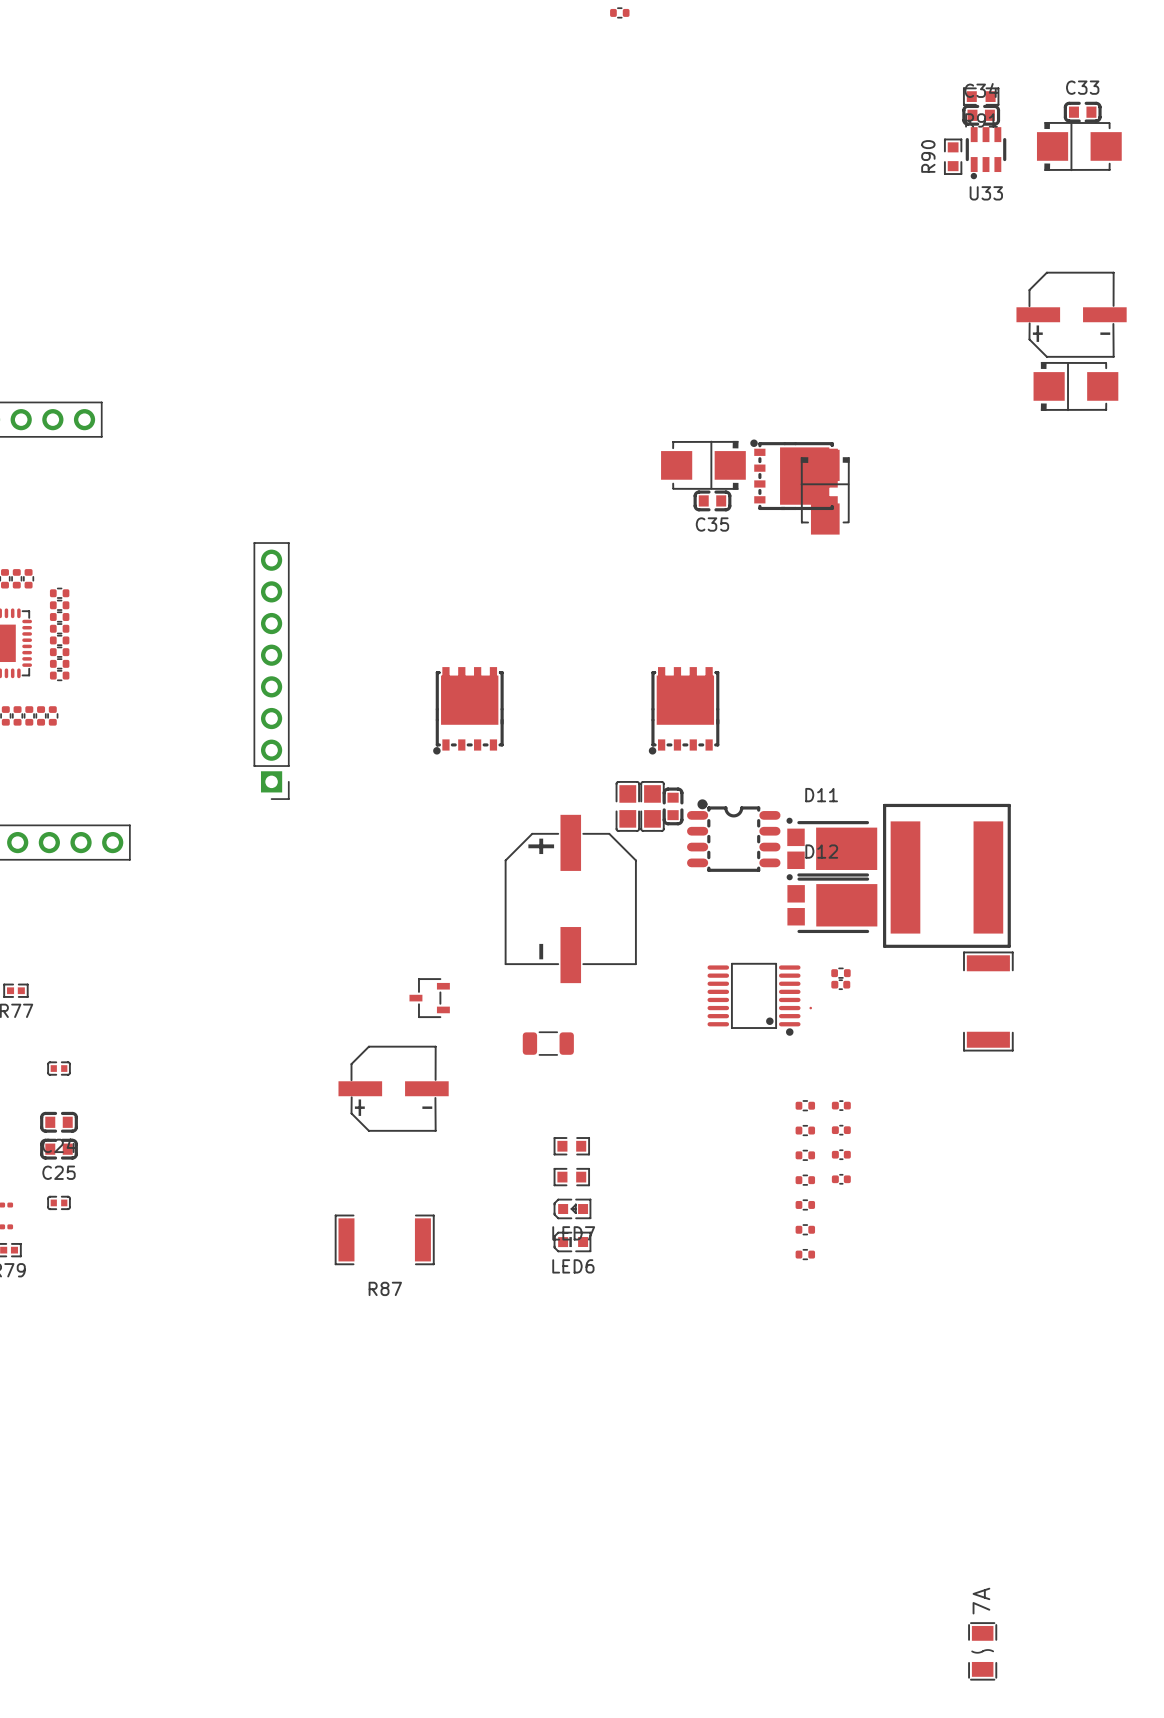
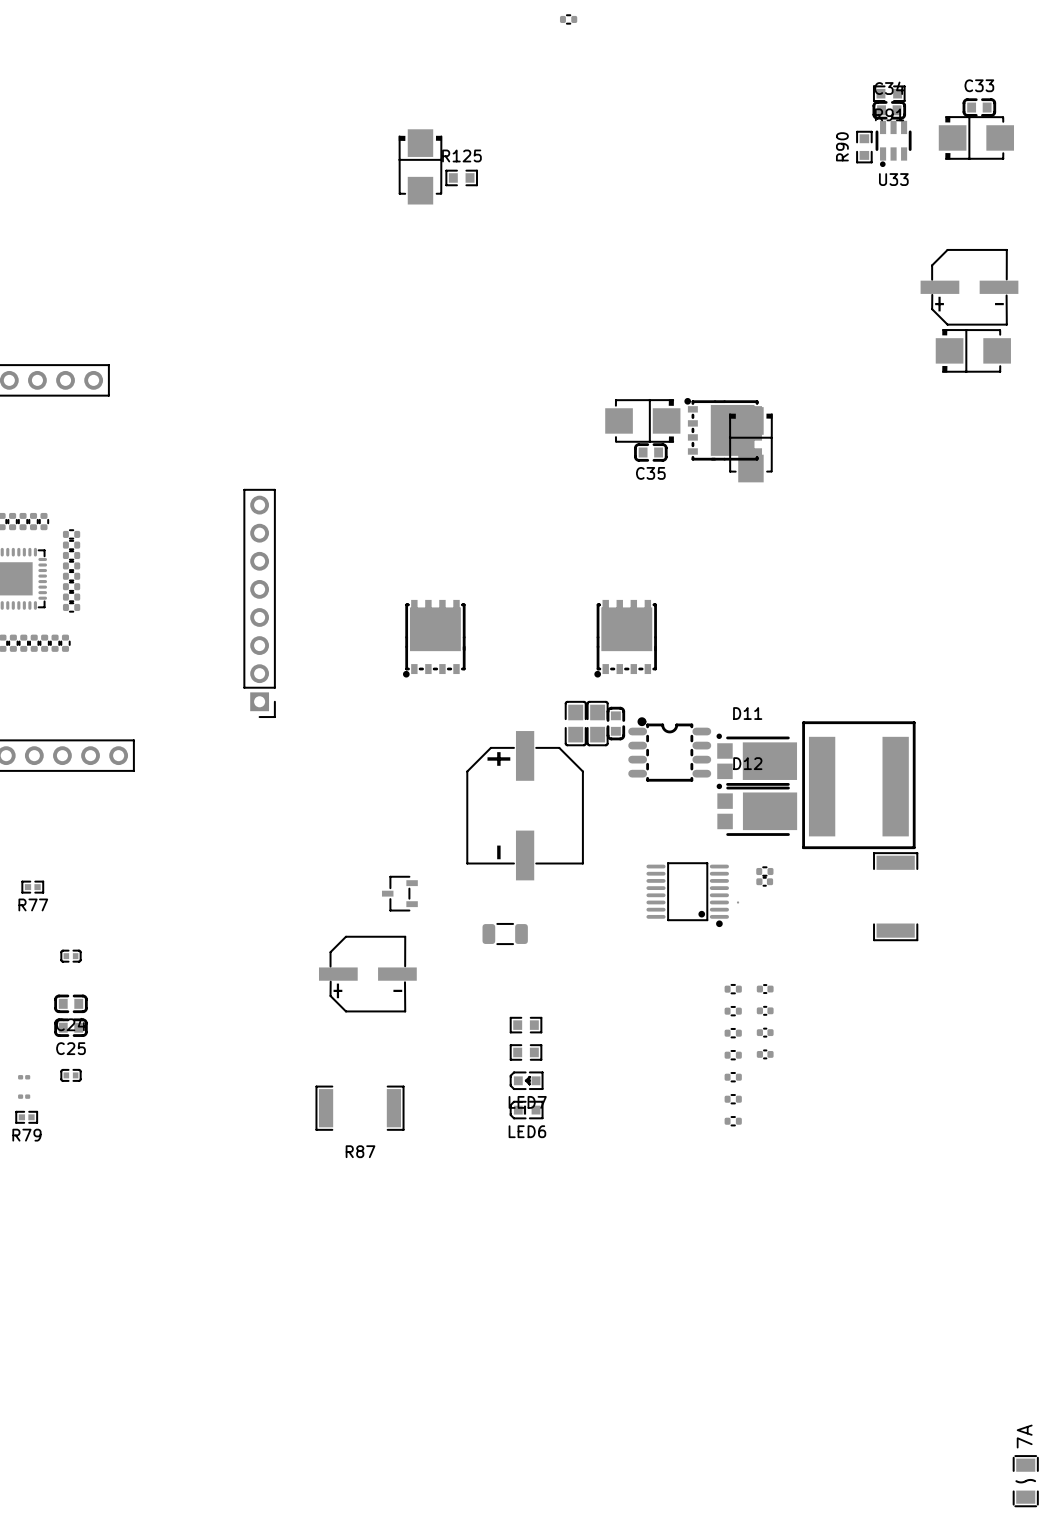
part: none -> (420, 166)
R125: none -> (461, 177)
part position: (982, 1651) -> (1025, 1481)

